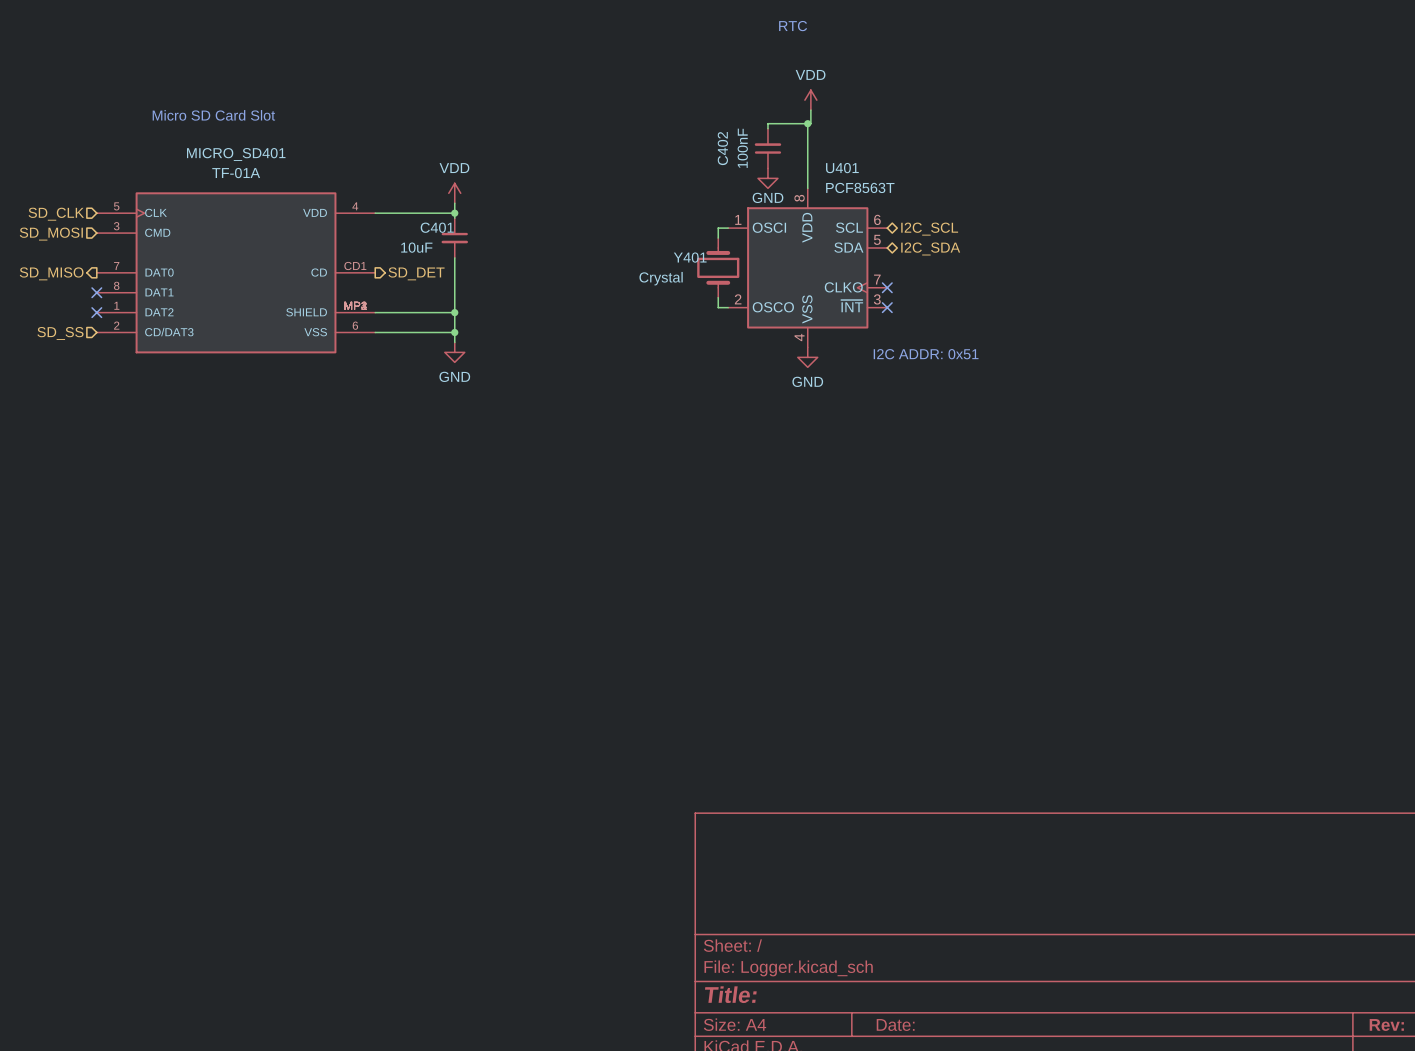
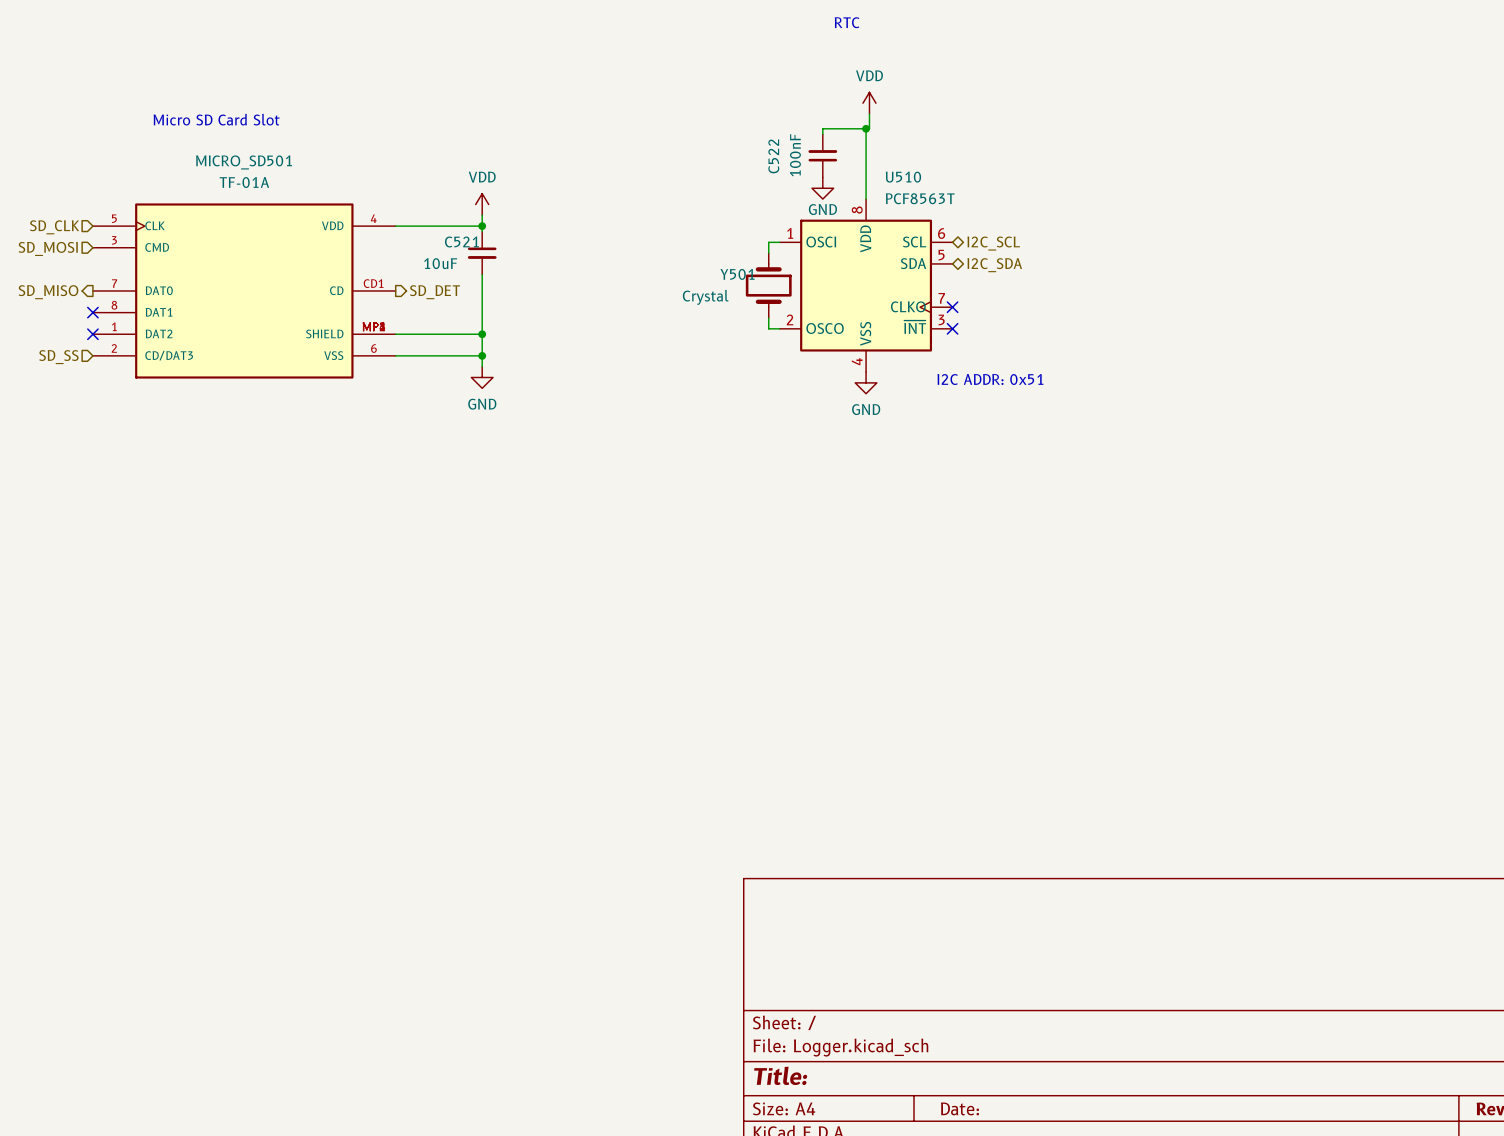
C402 name: C402 (722, 148) -> C522 (773, 156)
MICRO_SD401 name: MICRO_SD401 (236, 154) -> MICRO_SD501 (244, 162)
U401 name: U401 (842, 168) -> U510 (903, 177)
C401 name: C401 (437, 227) -> C521 (461, 241)
Y401 name: Y401 (690, 257) -> Y501 (737, 274)

